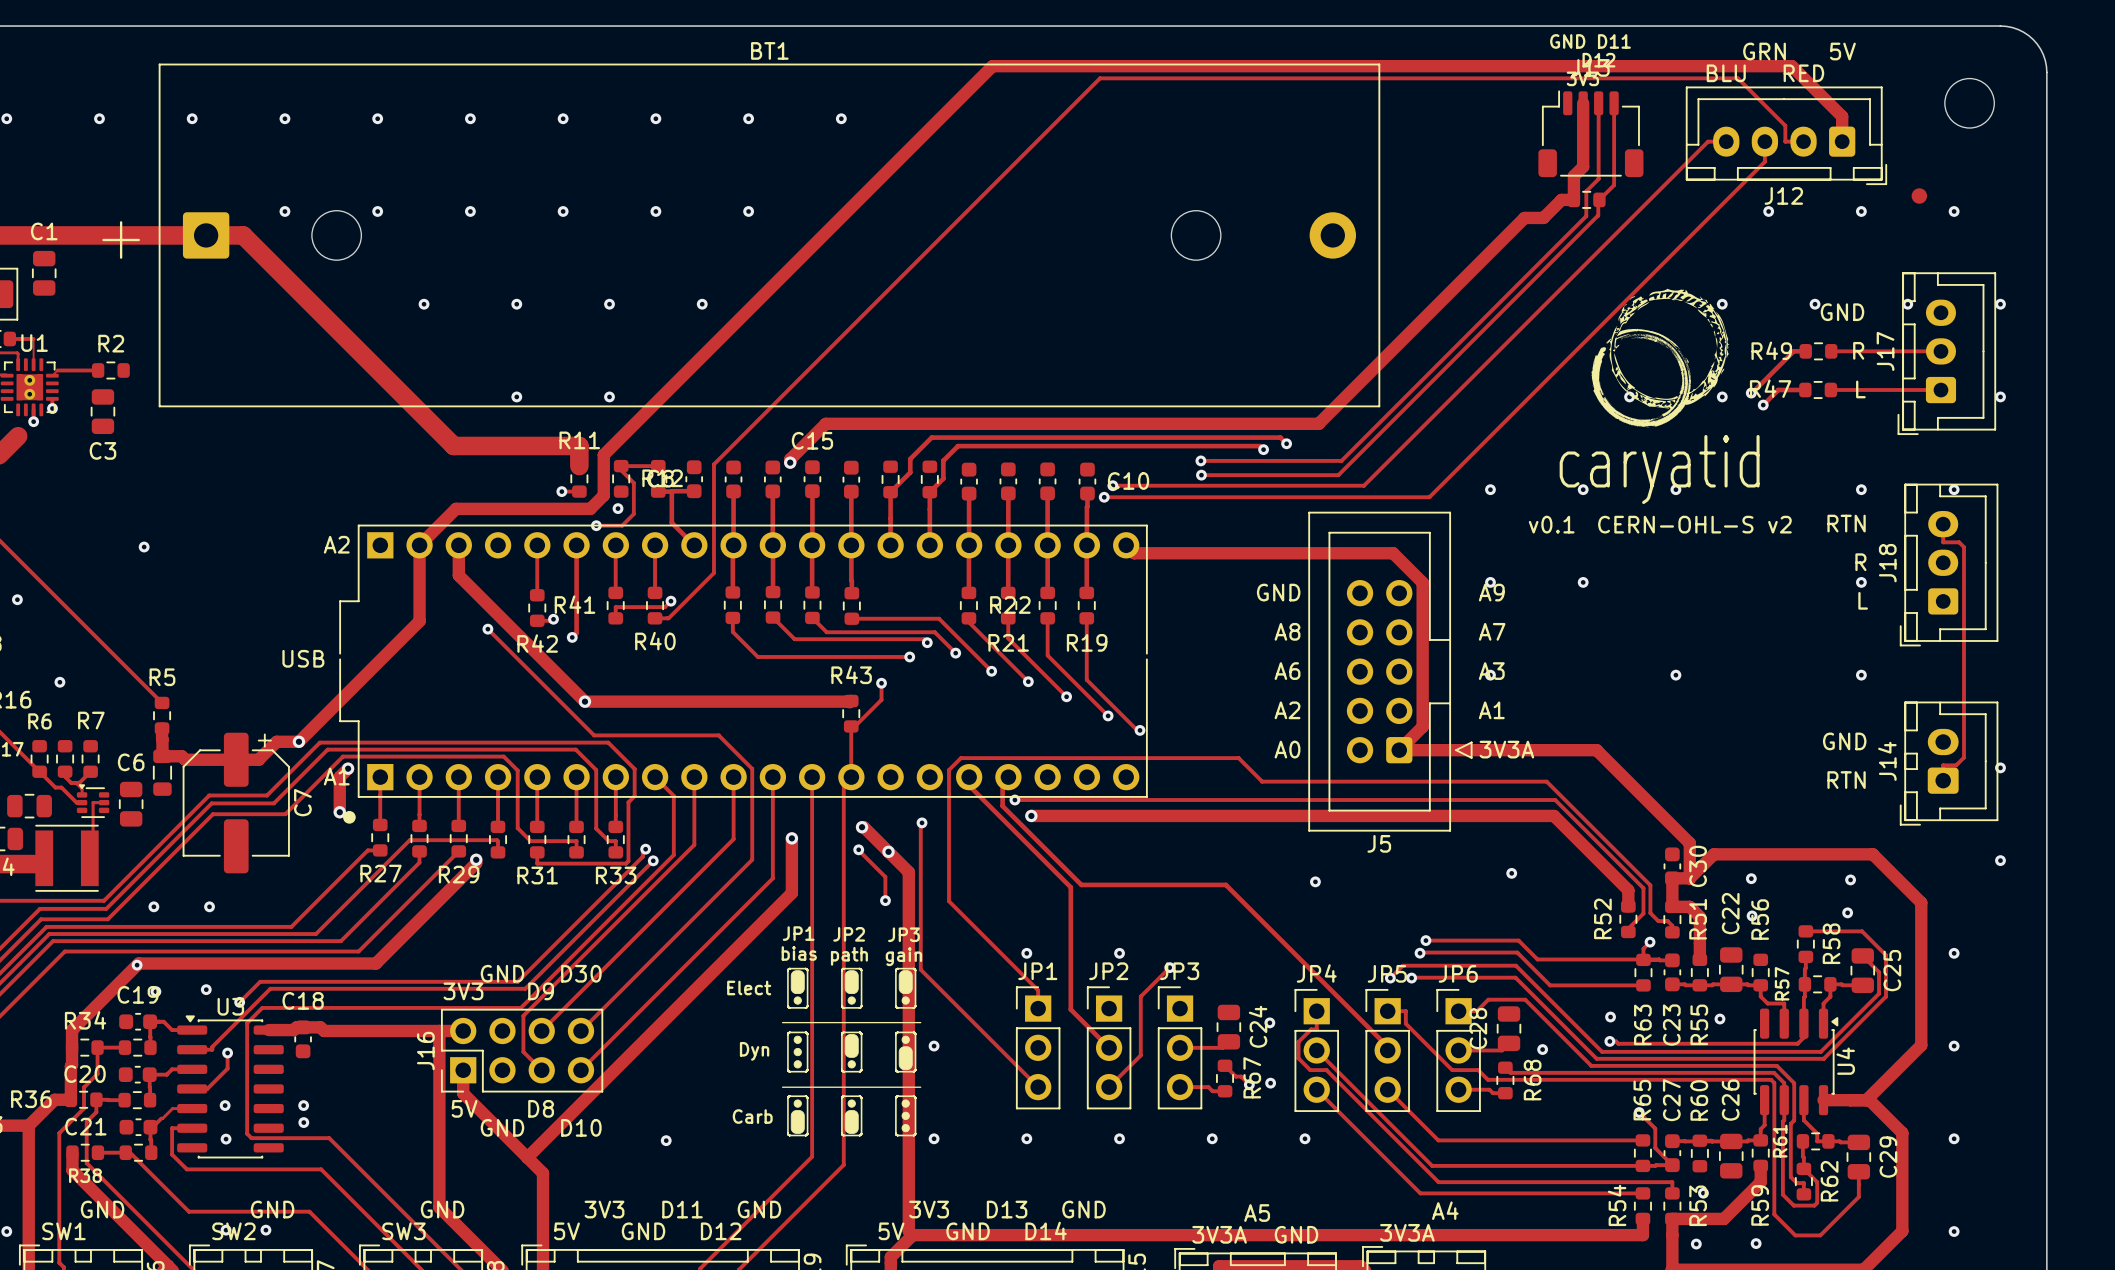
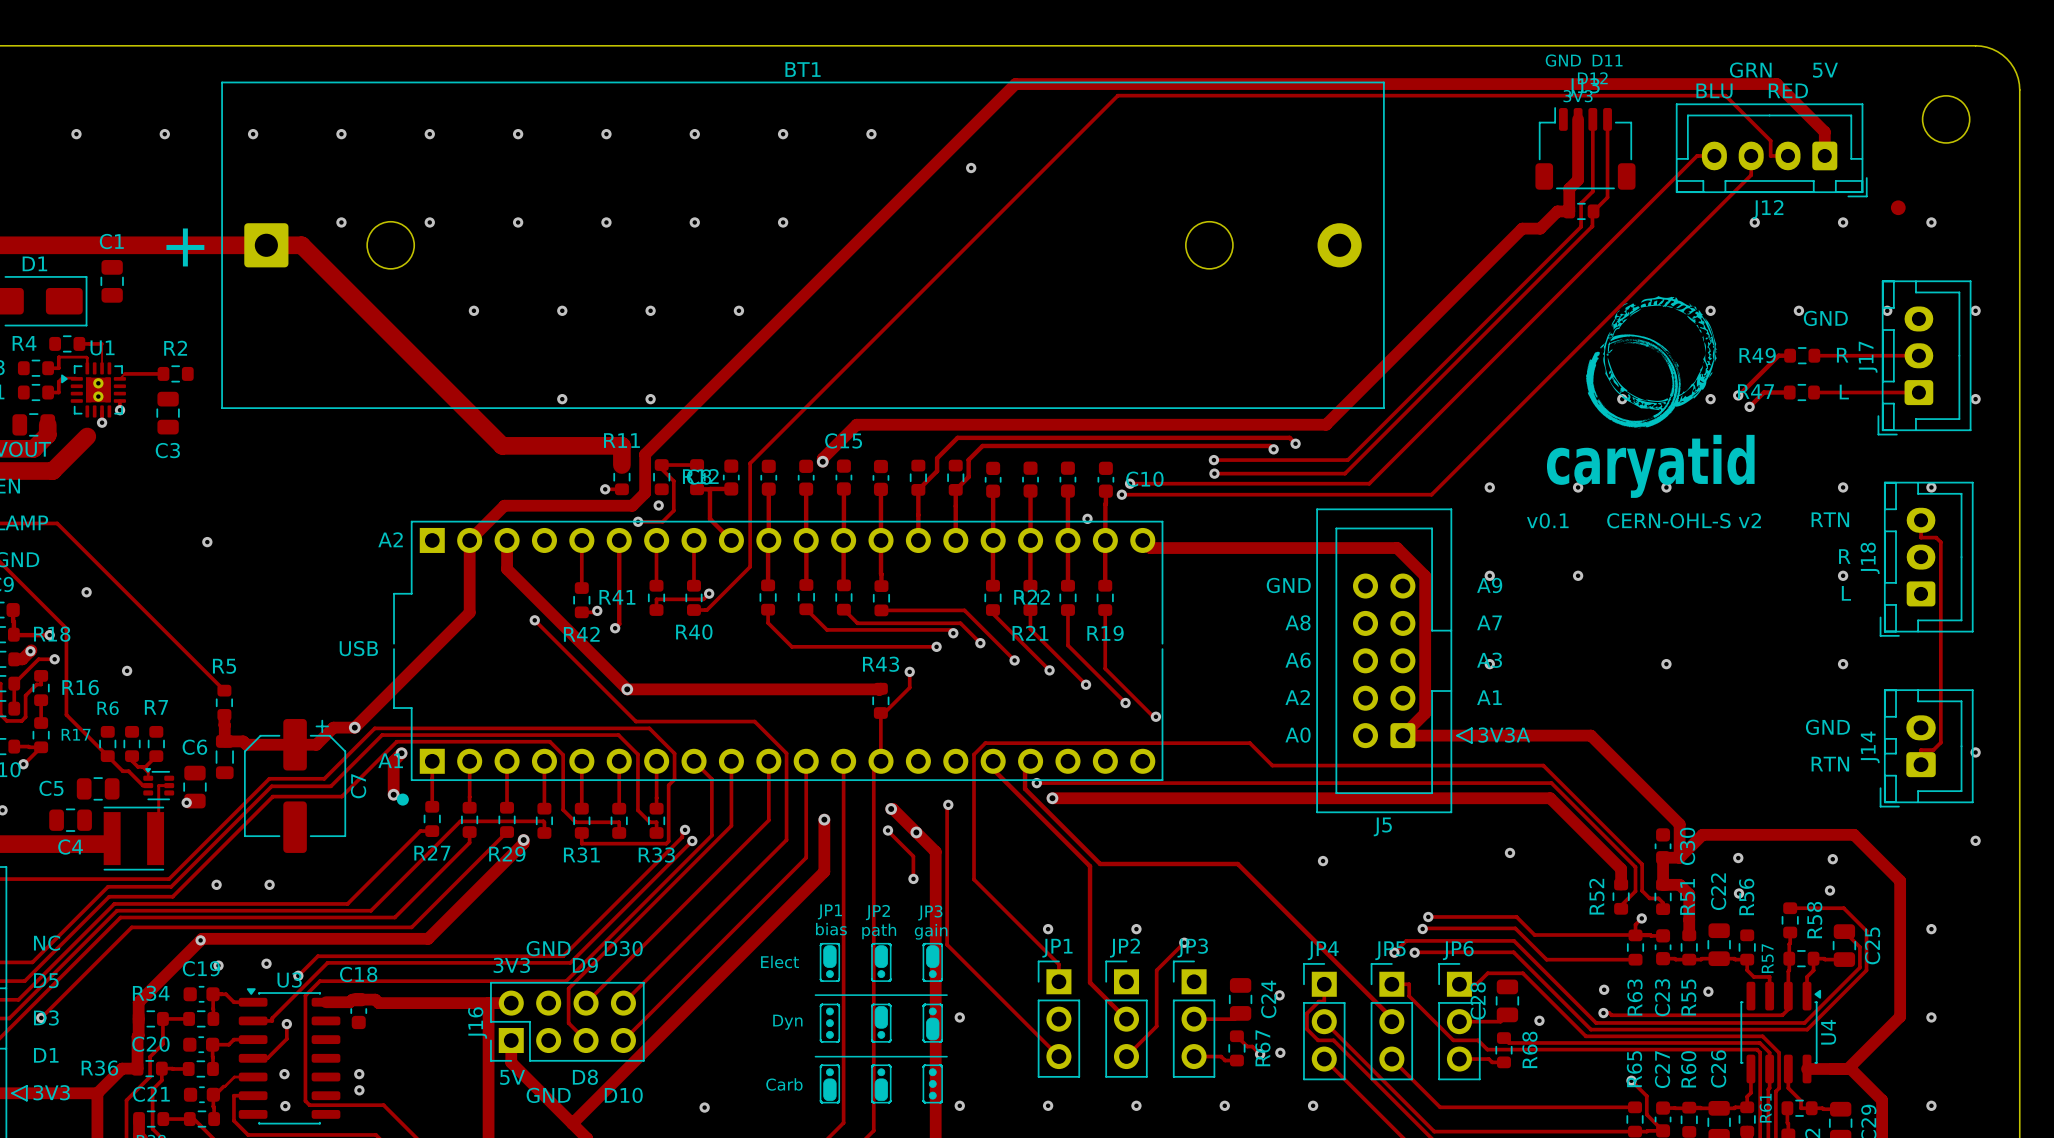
via: none -> (971, 167)
via: none -> (1087, 518)
via: none -> (186, 802)

